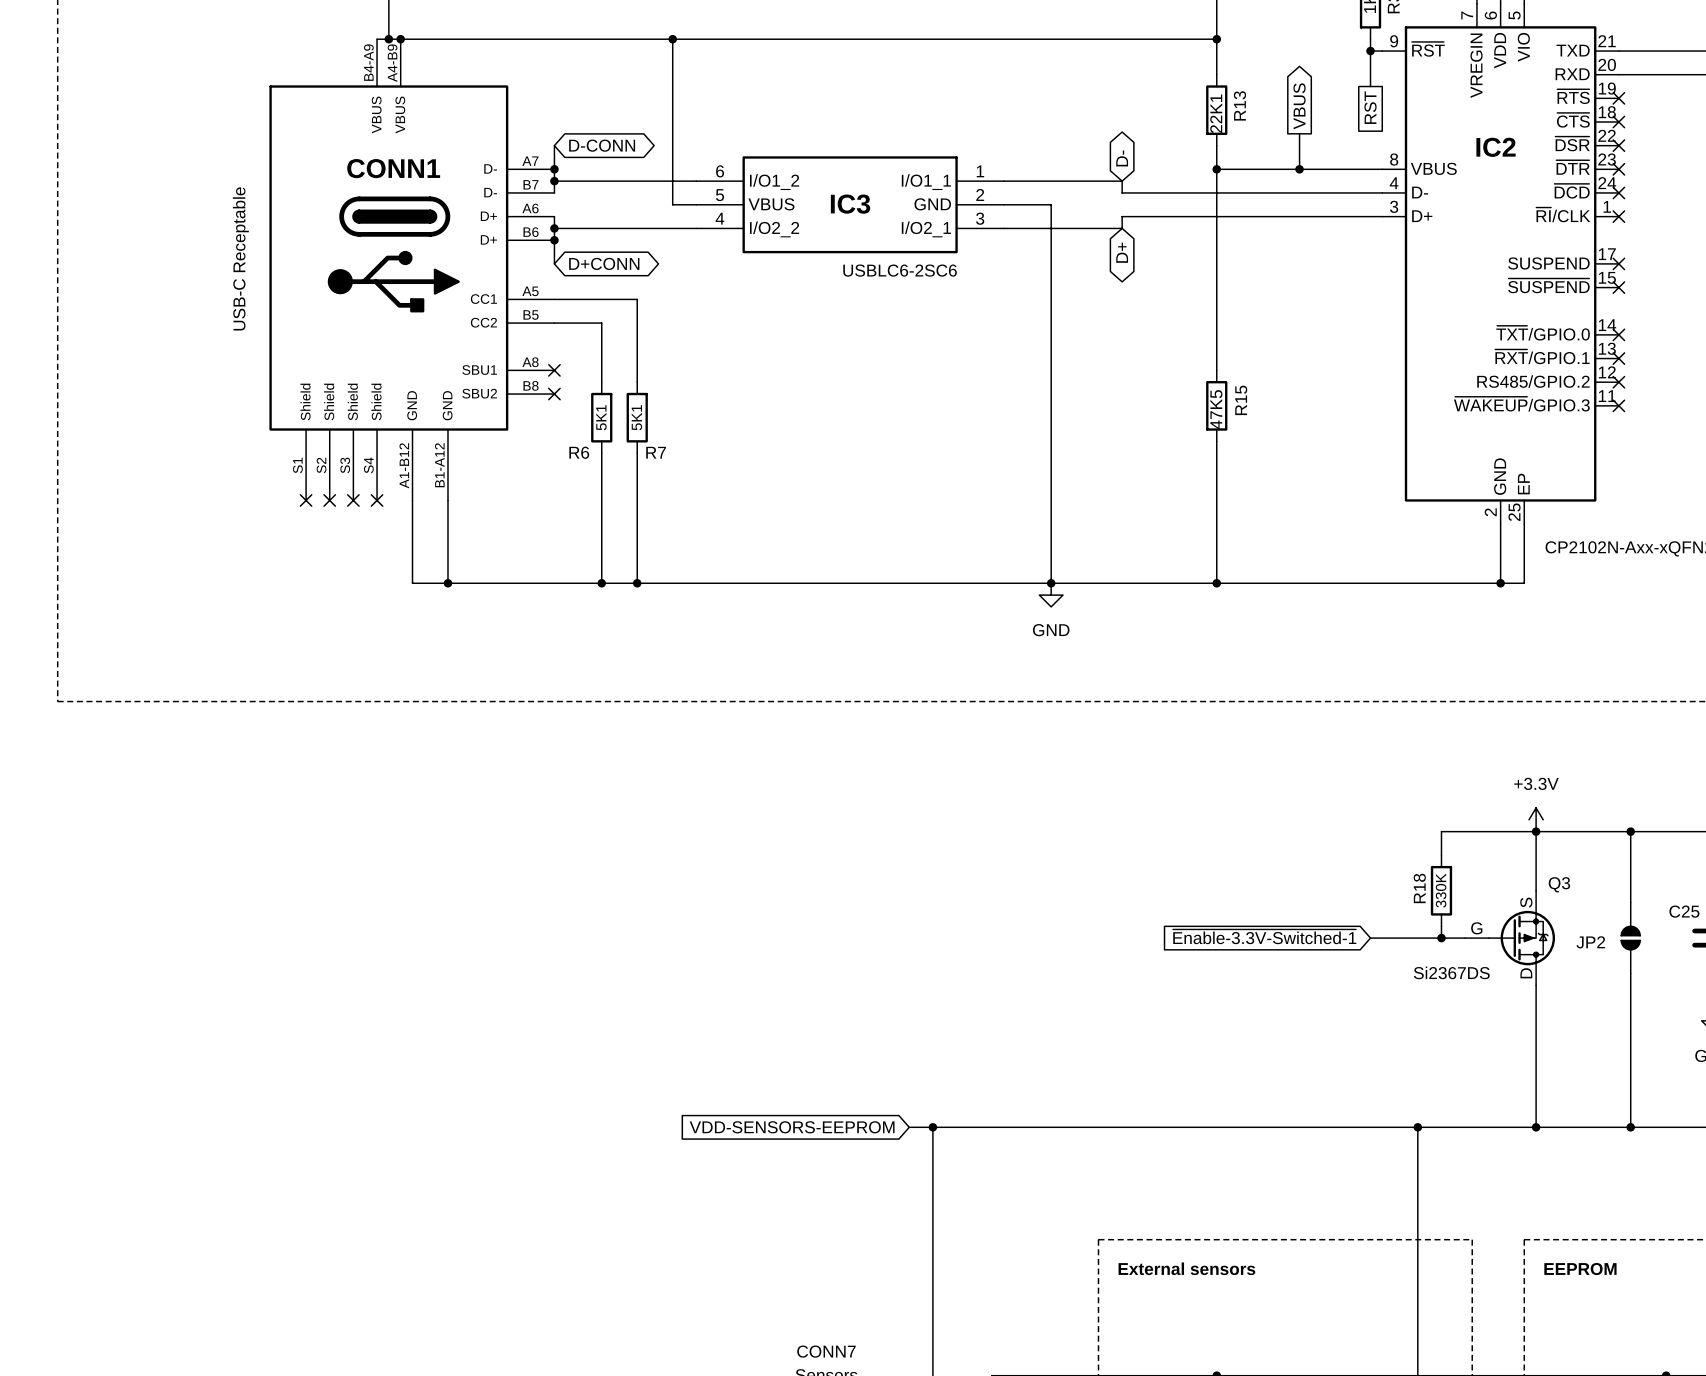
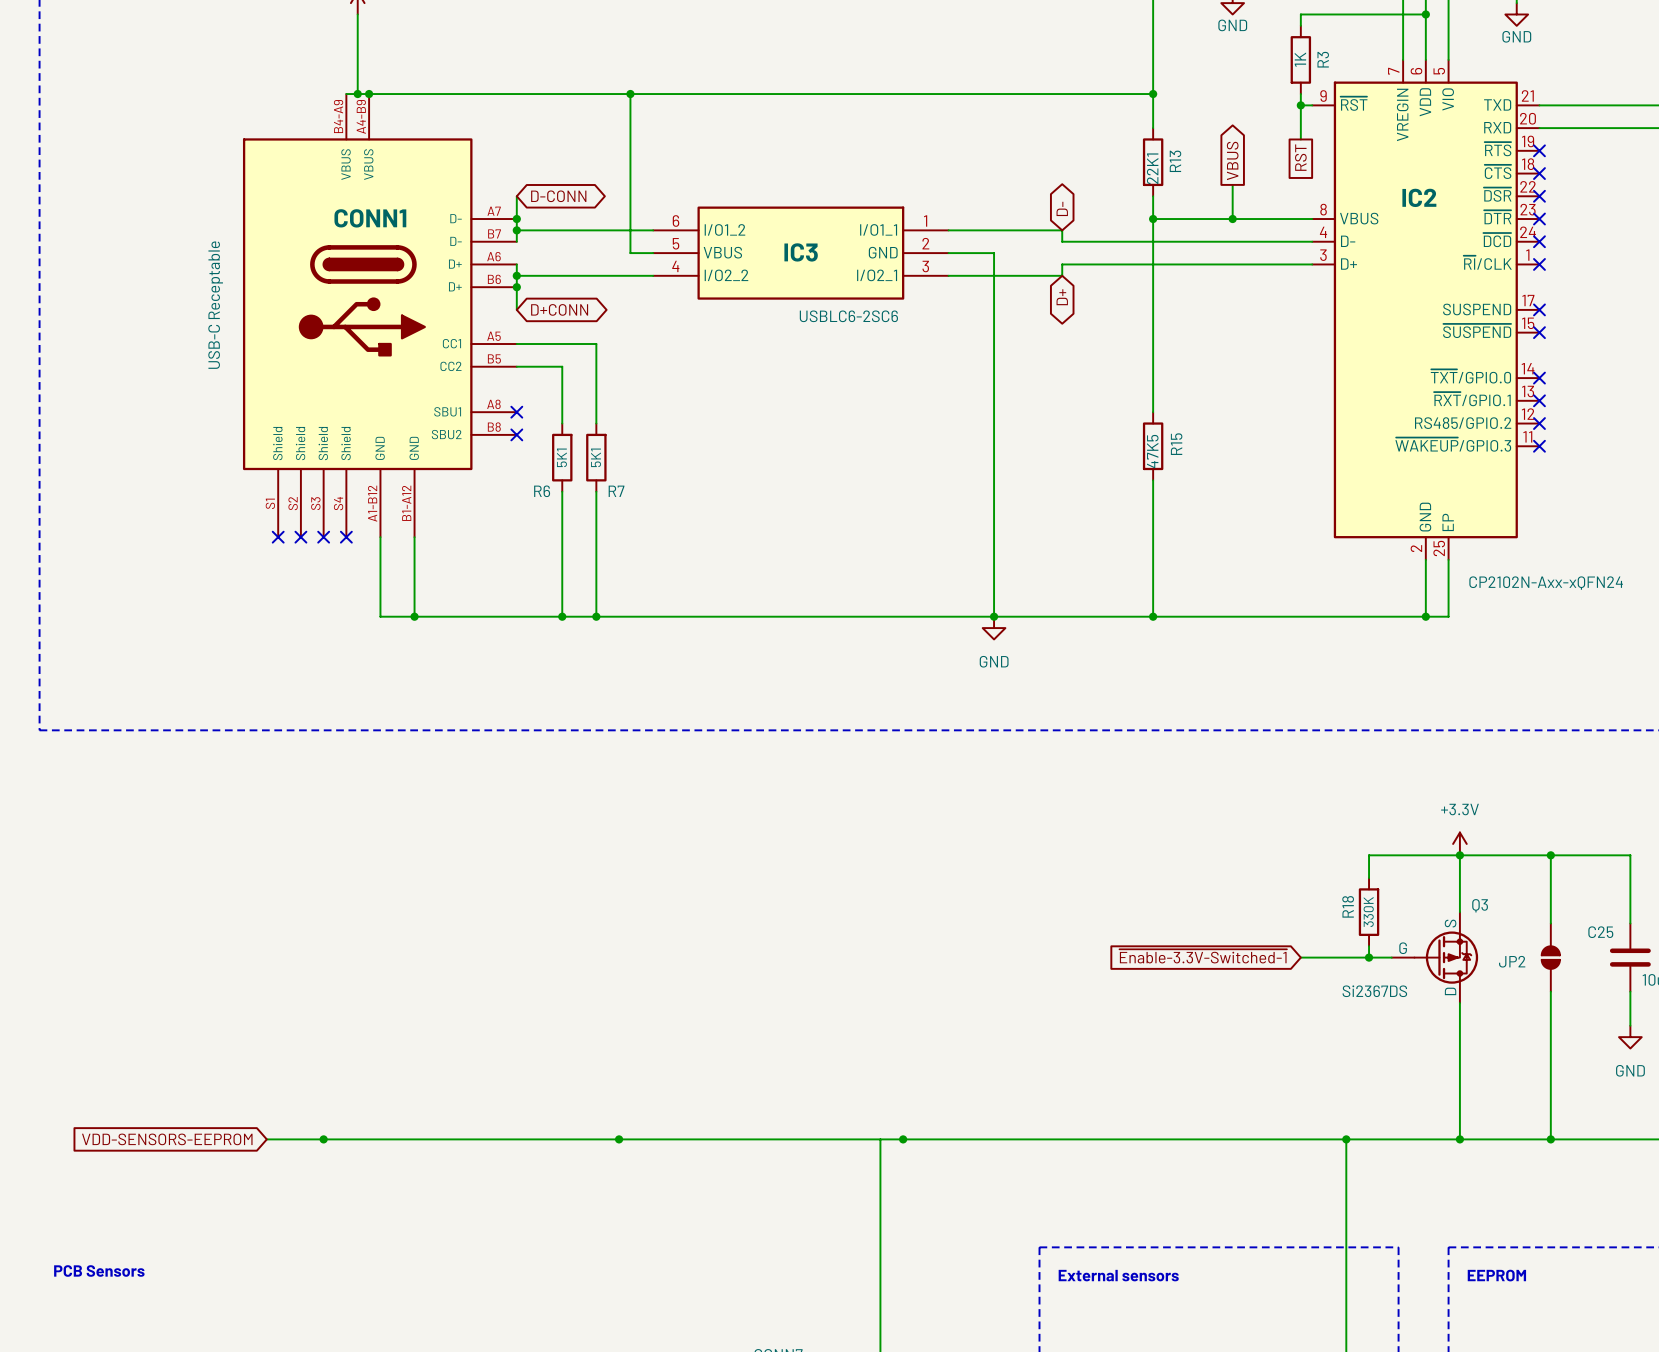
global label: none -> VDD-SENSORS-EEPROM (167, 1139)
wire: none -> (266, 1139) (857, 1139)
junction: none -> (323, 1139)
junction: none -> (619, 1139)
global label: VDD-SENSORS-EEPROM (792, 1127) -> none
junction position: (932, 1127) -> (903, 1139)
text: none -> PCB Sensors (99, 1270)

